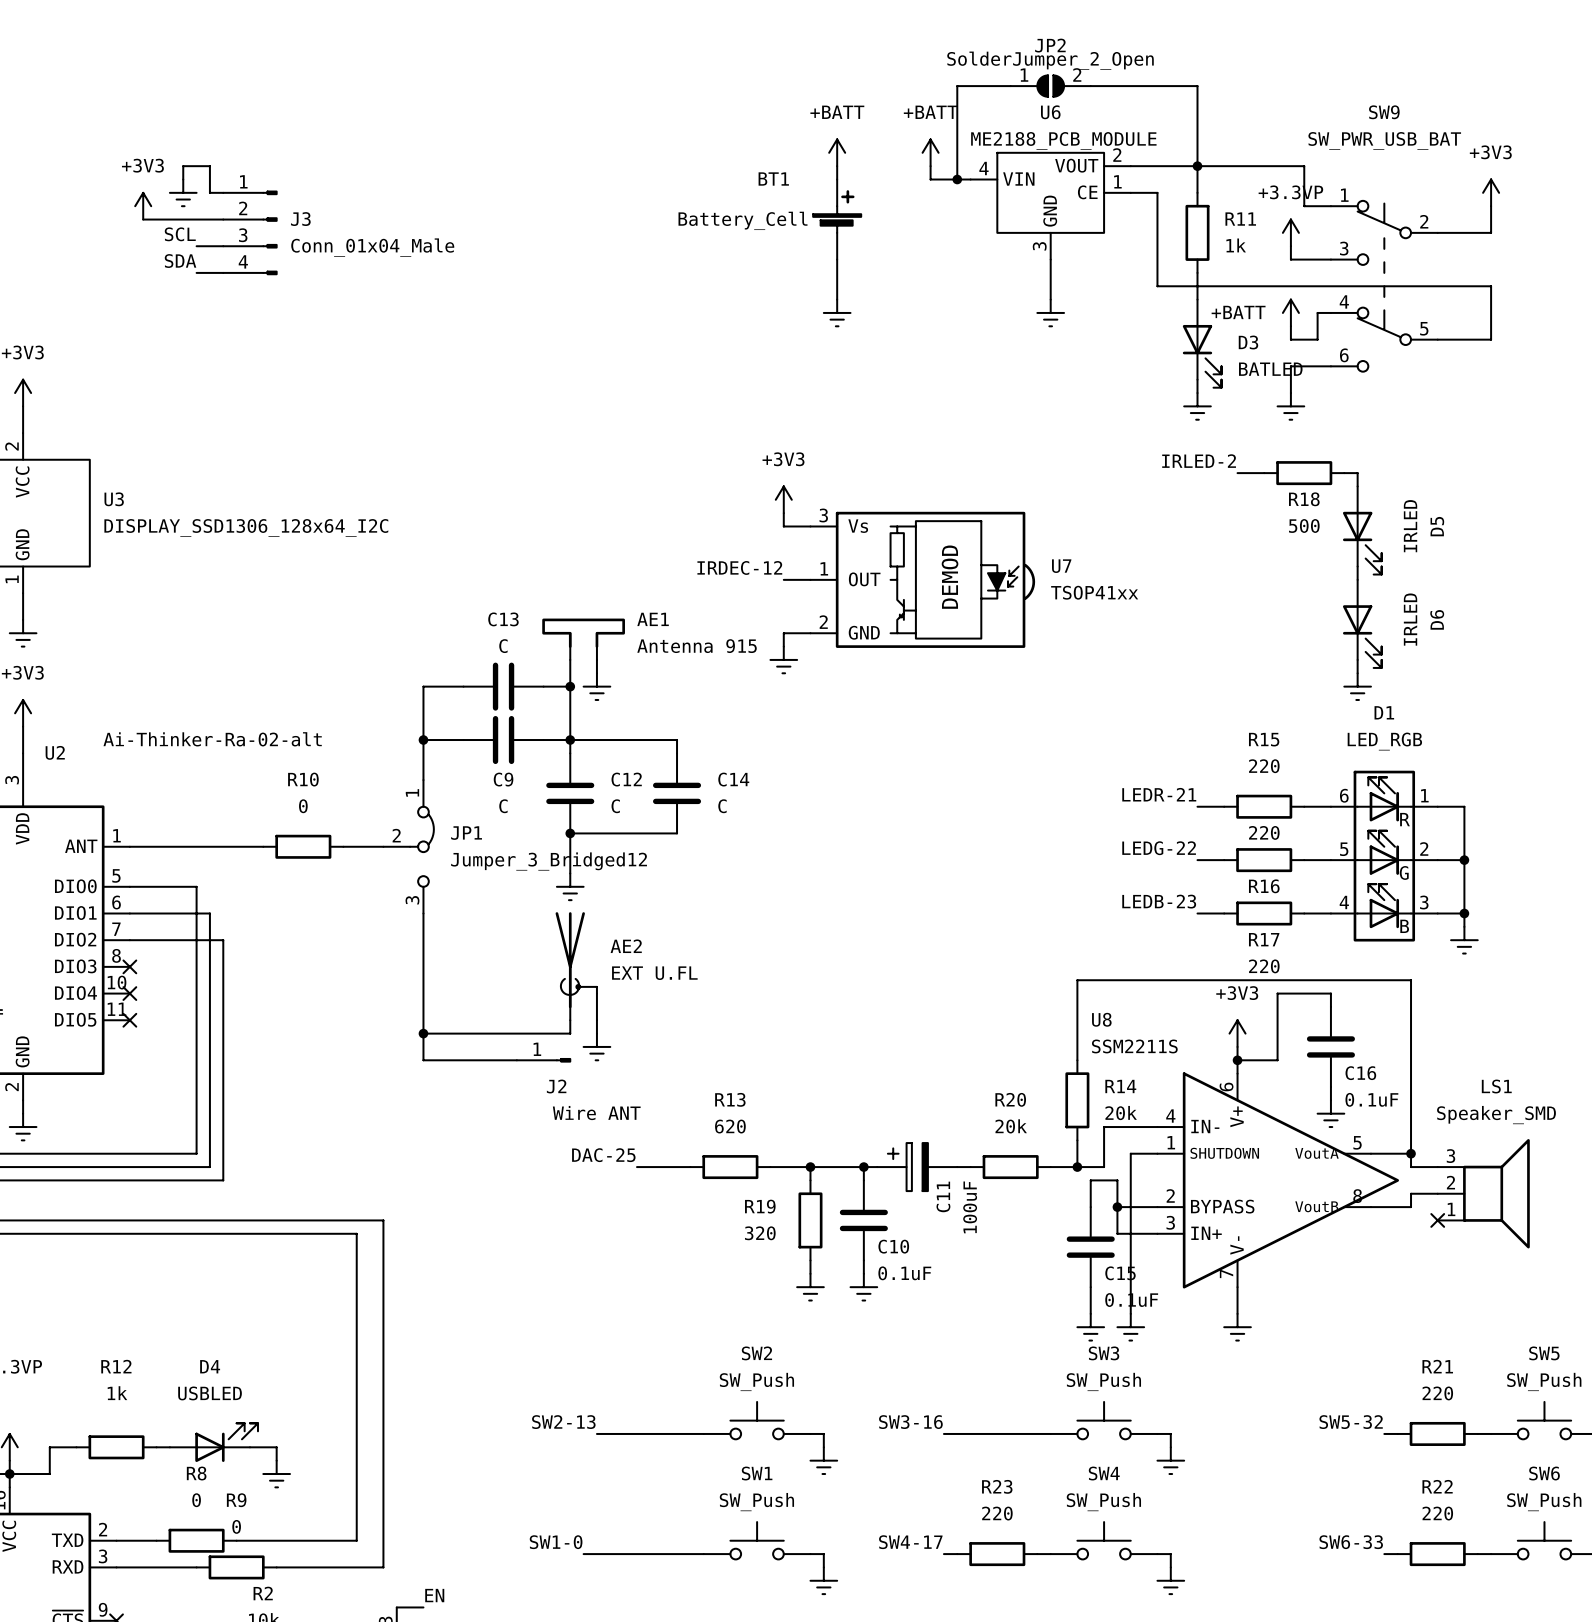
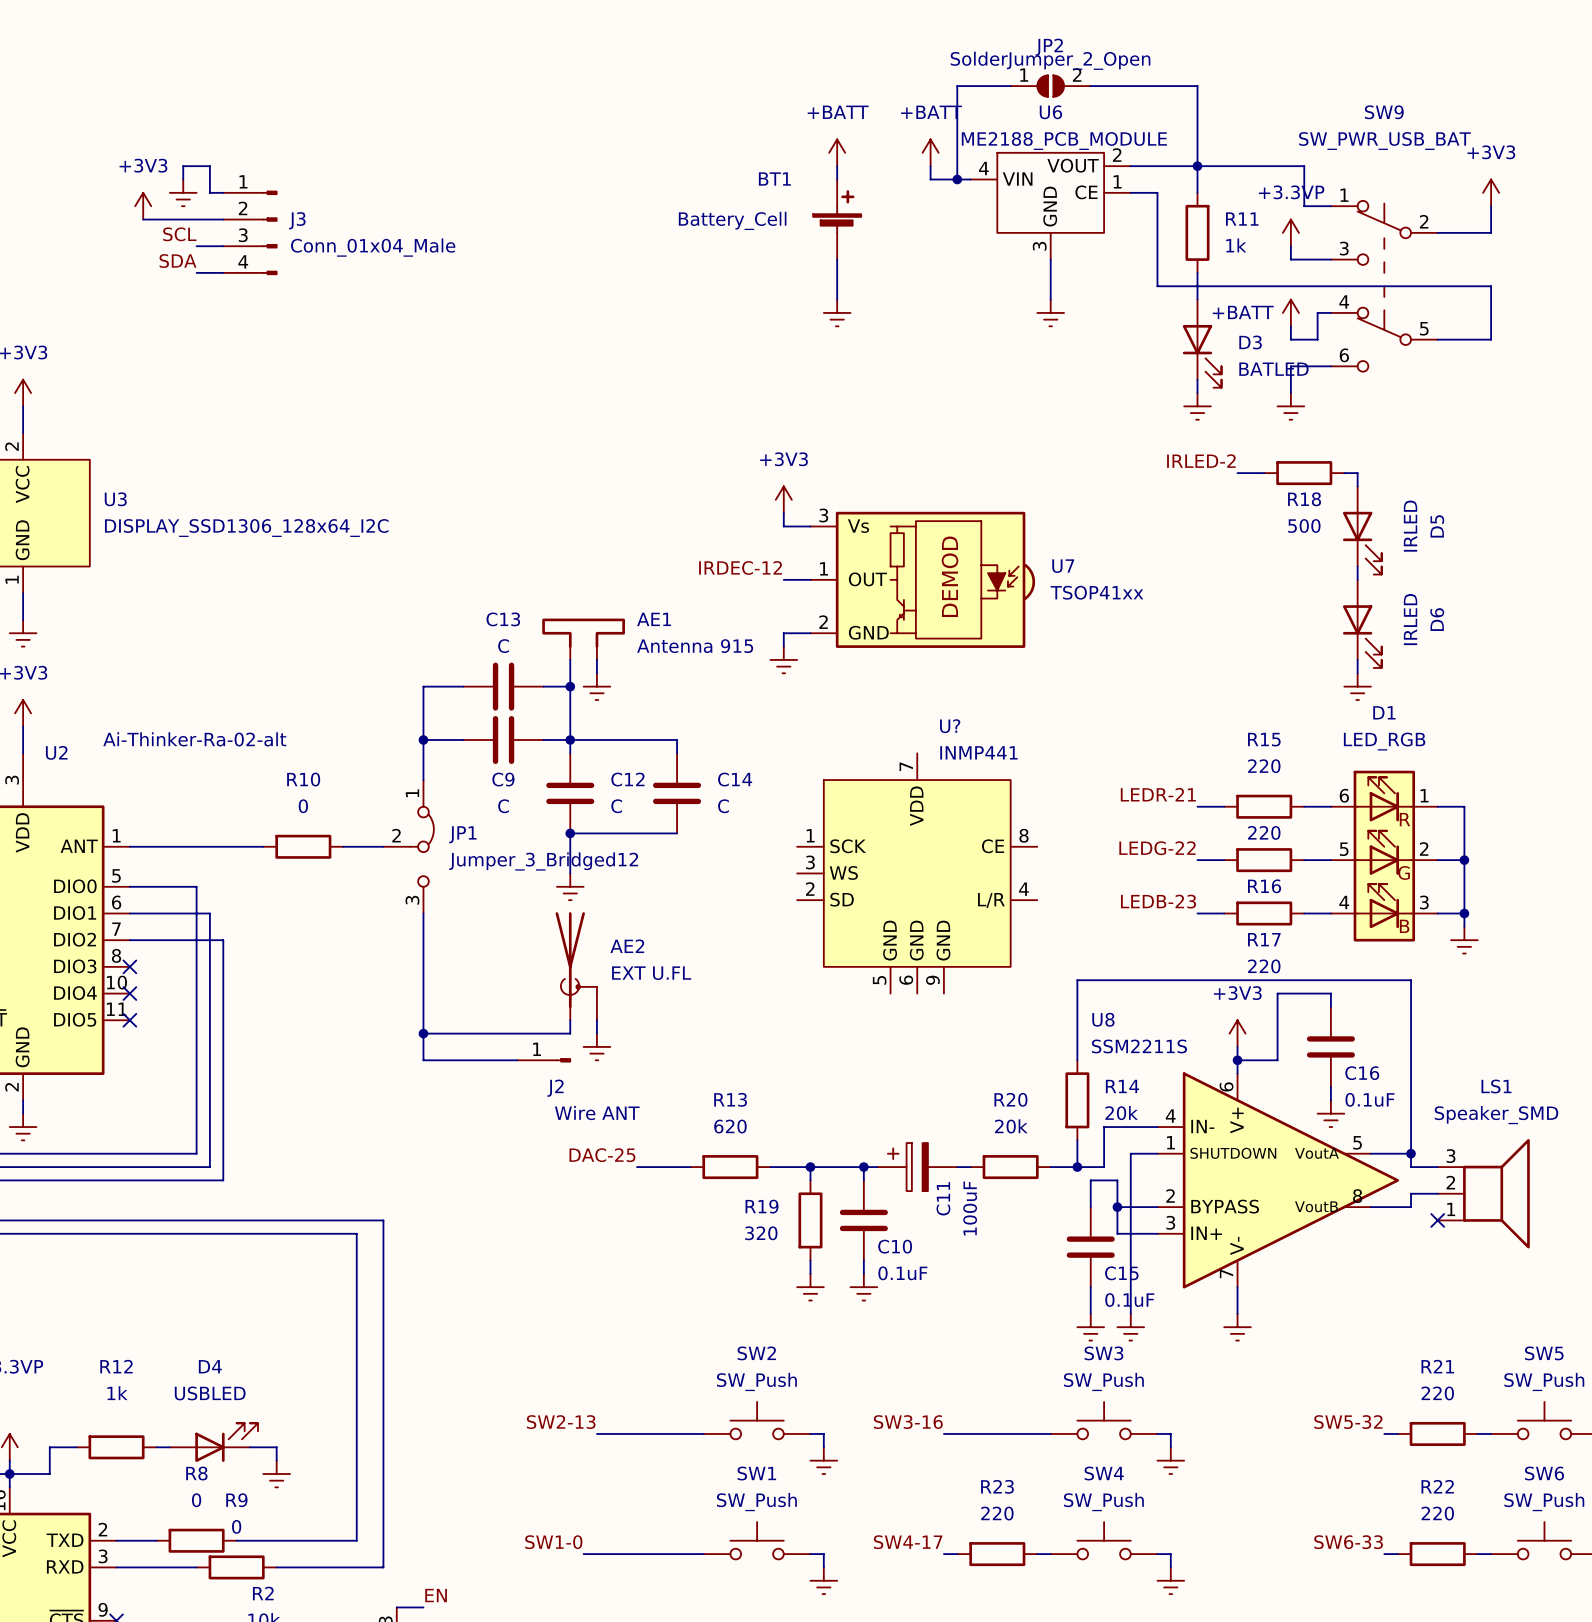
U?: none -> INMP441 (917, 873)

